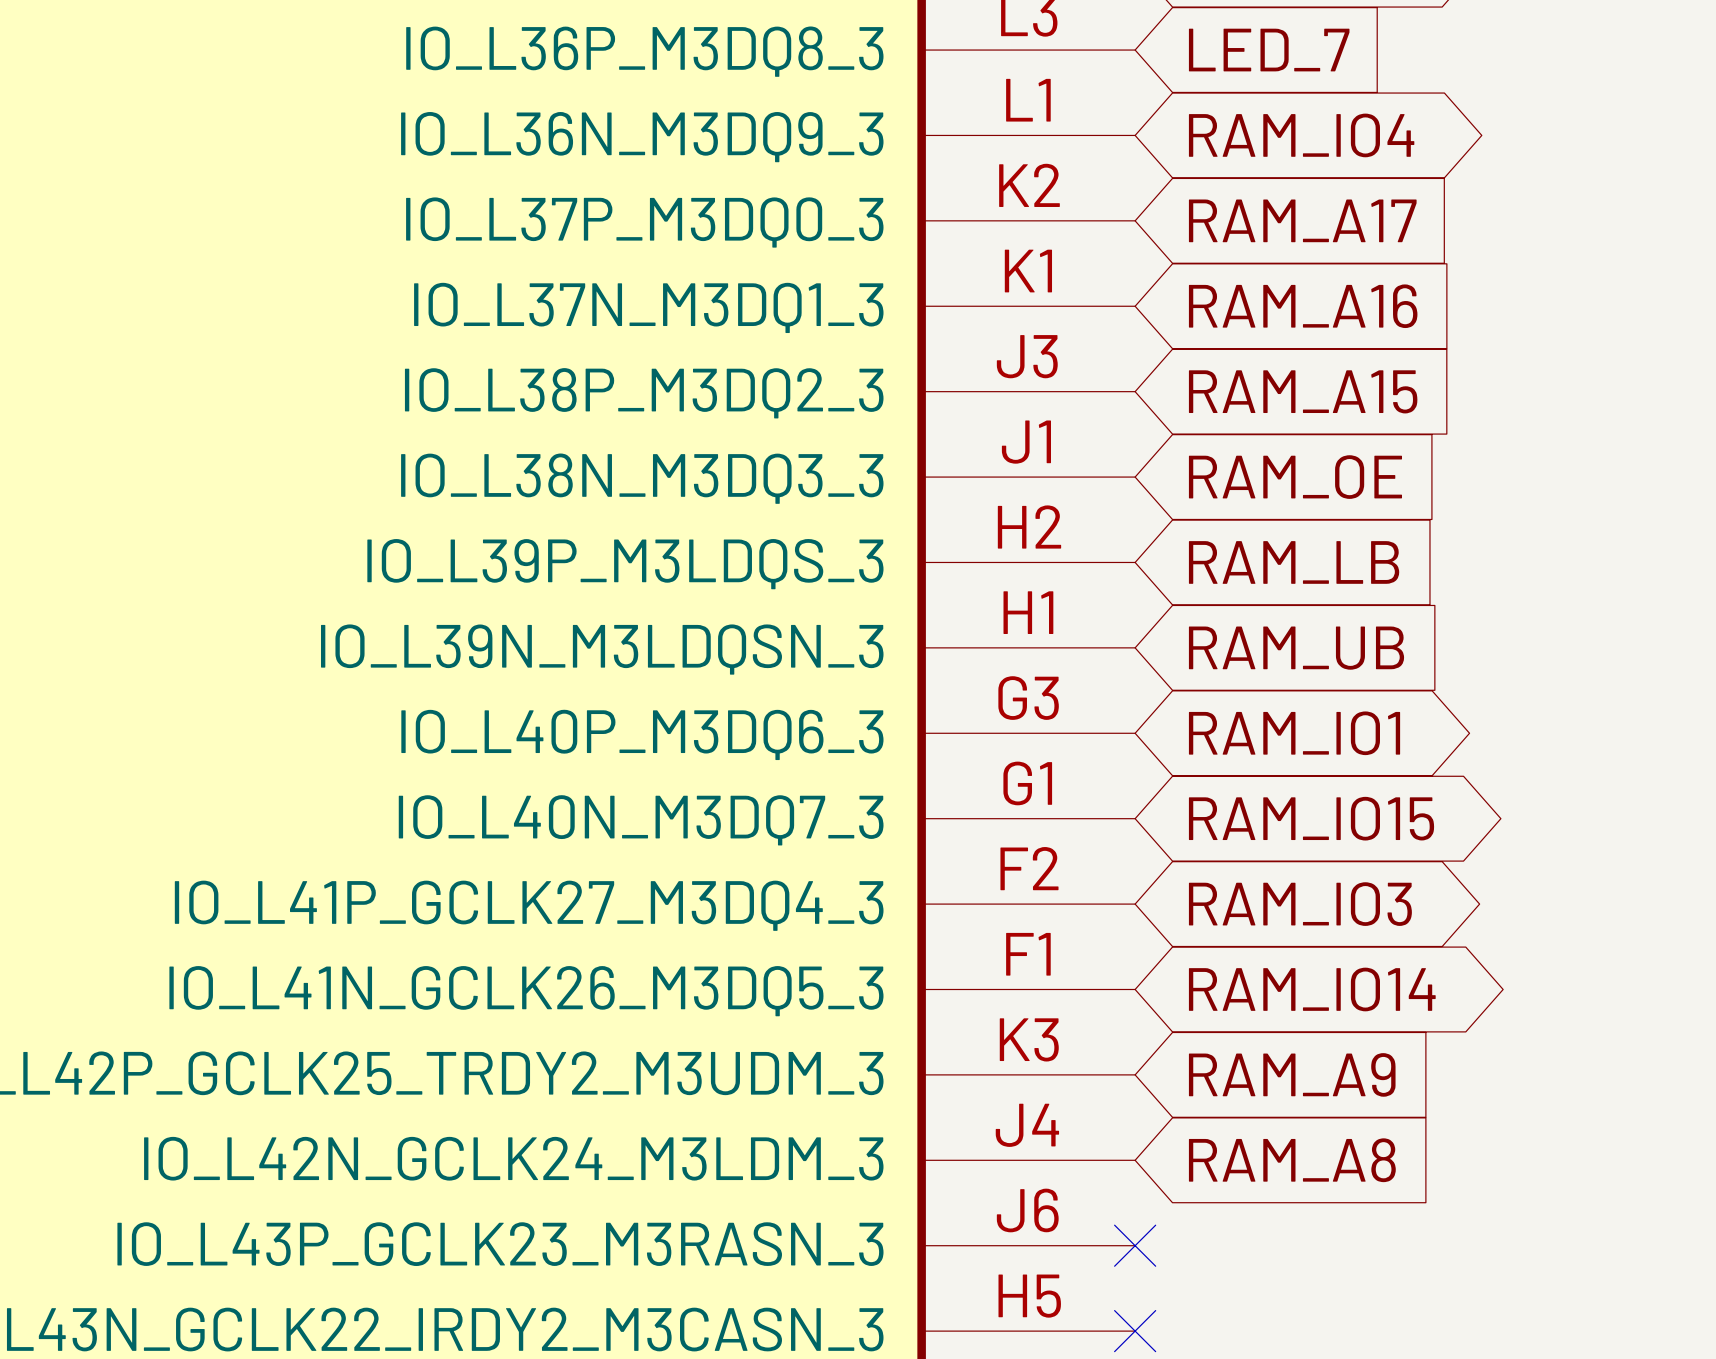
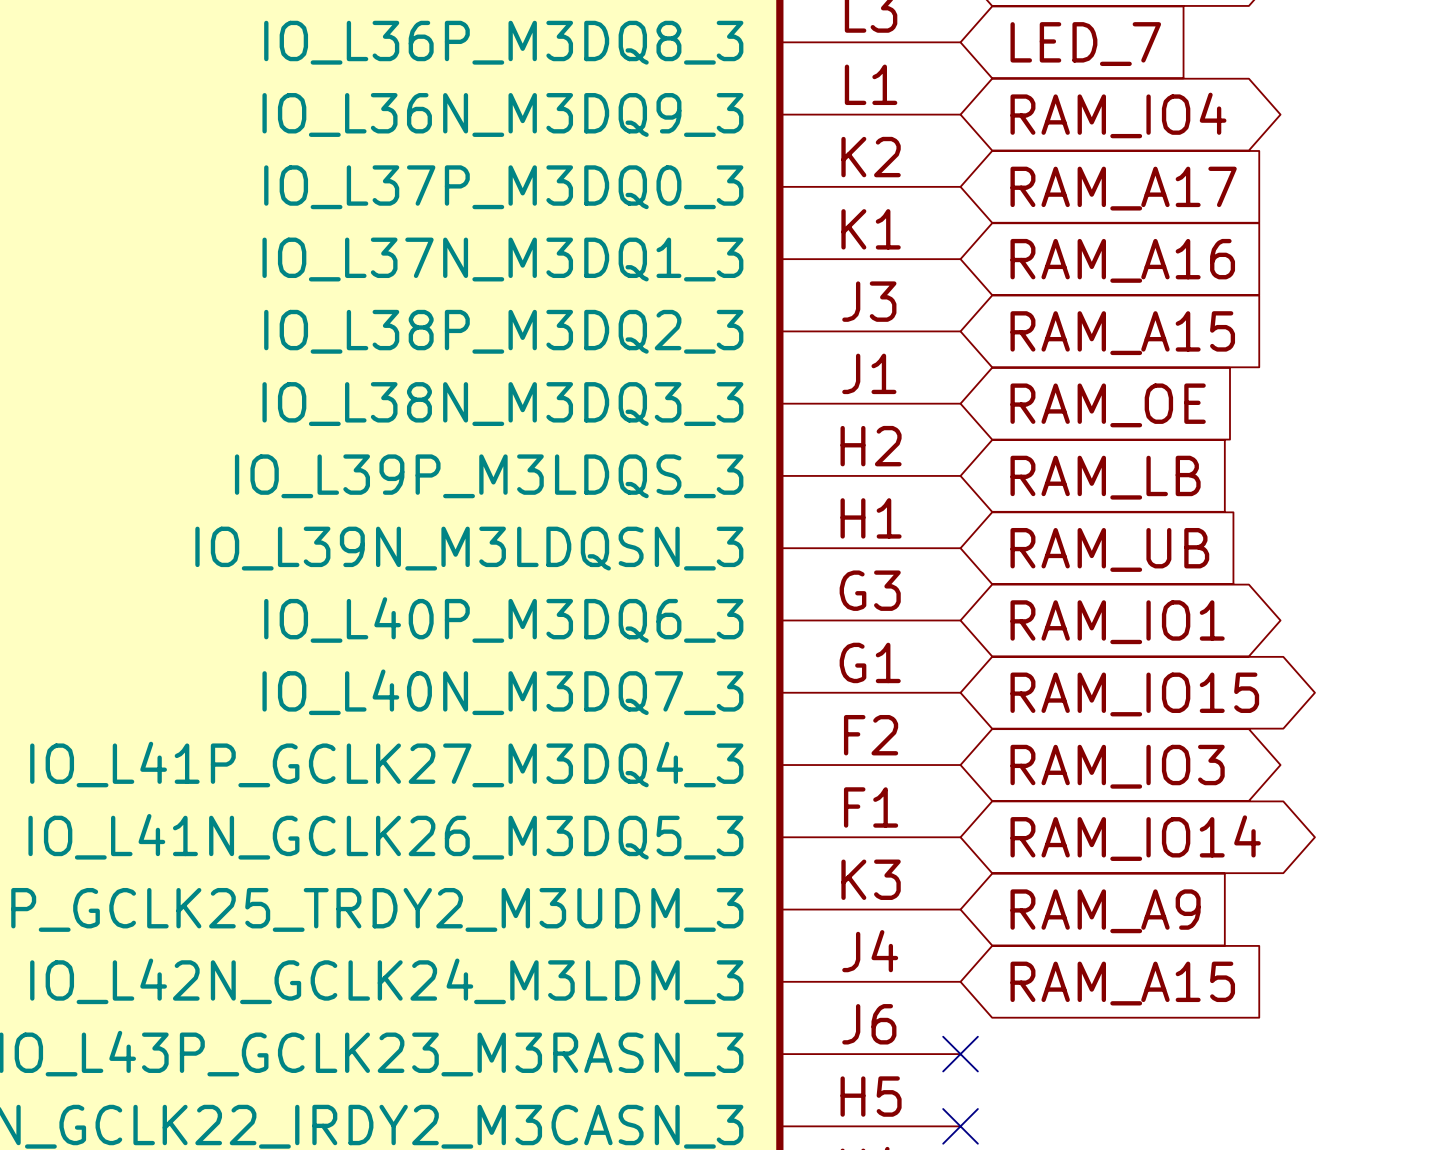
global label: RAM_A8 (1292, 1160) -> RAM_A15 (1122, 983)

